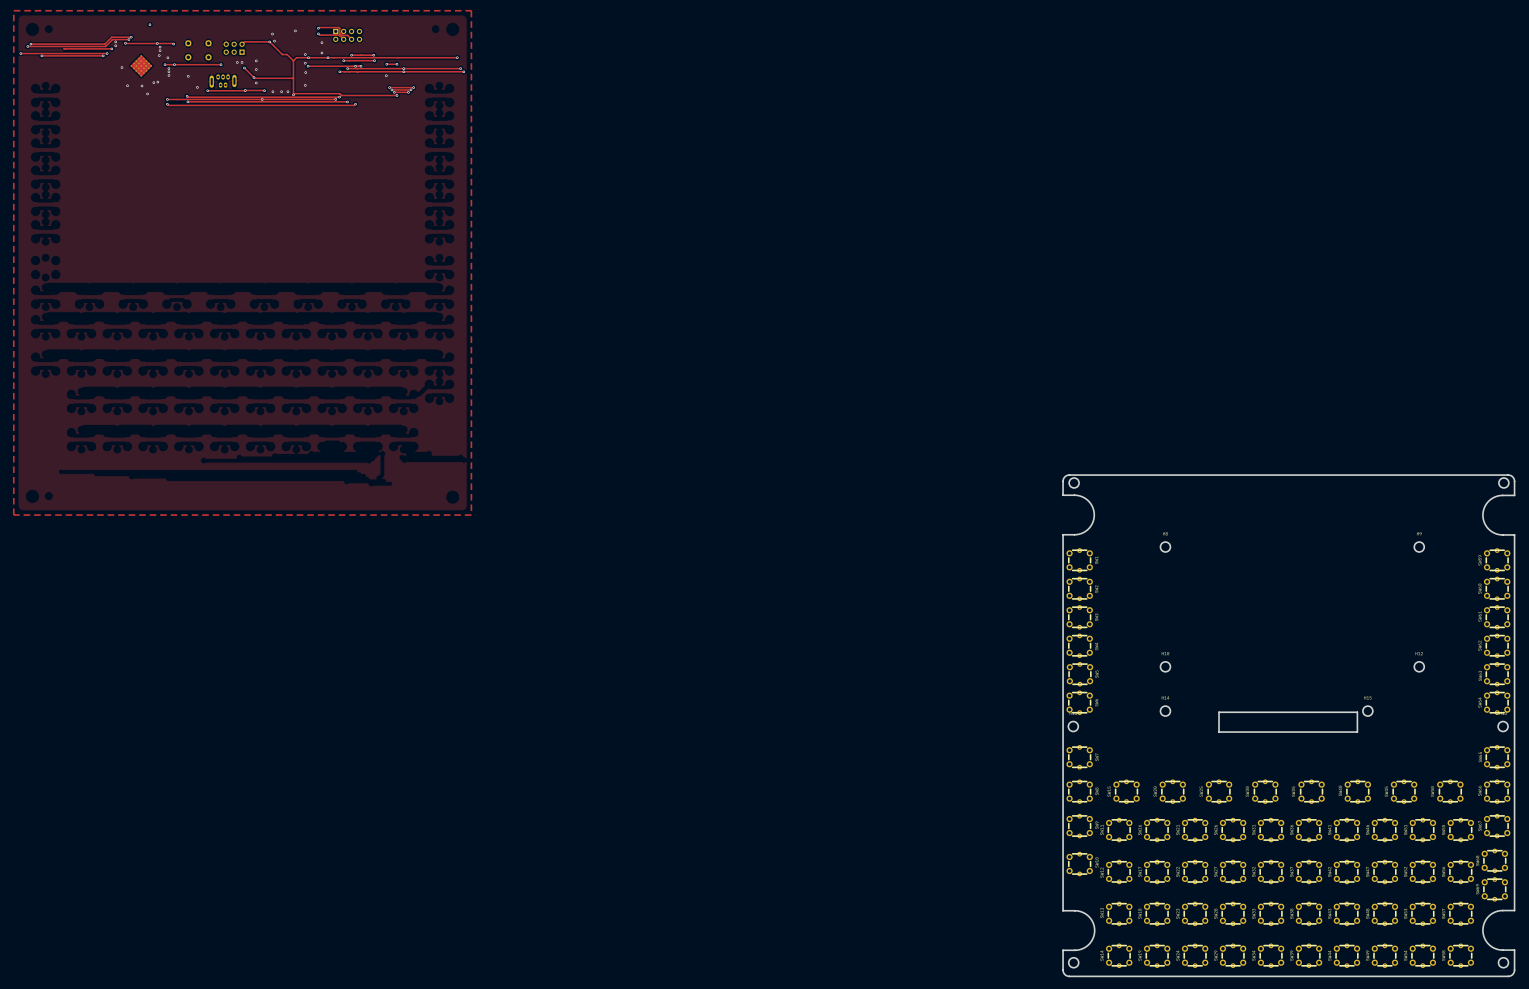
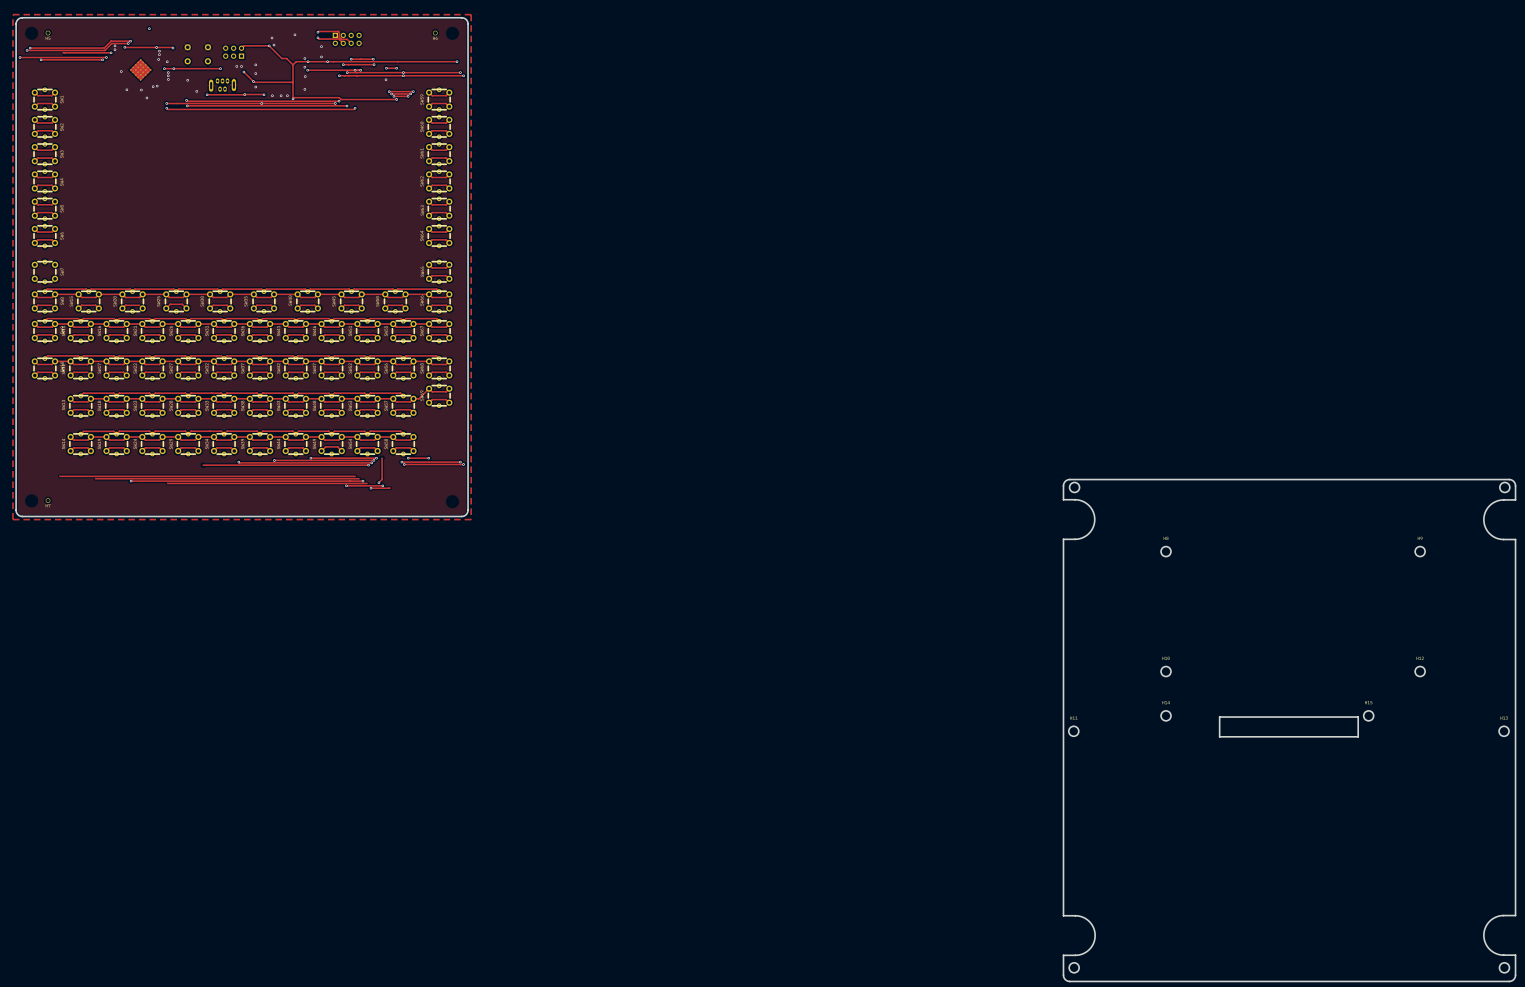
board edge: none -> (22, 17) (461, 17) (466, 19) (468, 24) (468, 510) (466, 514) (461, 516) (22, 516) (17, 514) (16, 510) (16, 24) (17, 19) (22, 17)
part: none -> (48, 33)
part: none -> (435, 33)
track: none -> (34, 92) (37, 95) (51, 95) (55, 92)
track: none -> (429, 92) (432, 95) (446, 95) (449, 92)
track: none -> (34, 106) (37, 103) (51, 103) (55, 107)
track: none -> (429, 106) (432, 103) (446, 103) (449, 106)
track: none -> (34, 119) (37, 122) (51, 122) (55, 119)
track: none -> (429, 119) (432, 122) (446, 122) (449, 119)
track: none -> (34, 133) (37, 130) (51, 130) (55, 133)
track: none -> (429, 133) (432, 130) (446, 130) (449, 133)
track: none -> (34, 147) (37, 150) (51, 150) (55, 147)
track: none -> (429, 147) (432, 150) (446, 150) (449, 147)
track: none -> (34, 161) (37, 158) (51, 158) (55, 161)
track: none -> (429, 161) (432, 158) (446, 158) (449, 161)
track: none -> (34, 174) (37, 177) (51, 177) (55, 174)
track: none -> (429, 174) (432, 177) (446, 177) (449, 174)
track: none -> (34, 188) (37, 185) (51, 185) (55, 188)
track: none -> (429, 188) (432, 185) (446, 185) (449, 188)
track: none -> (34, 201) (37, 204) (51, 204) (55, 201)
track: none -> (429, 201) (432, 204) (446, 204) (449, 201)
track: none -> (34, 215) (37, 212) (51, 212) (55, 215)
track: none -> (429, 215) (432, 212) (446, 212) (449, 215)
track: none -> (34, 228) (37, 232) (51, 232) (55, 228)
track: none -> (429, 228) (432, 232) (446, 232) (449, 228)
track: none -> (34, 242) (37, 239) (51, 239) (55, 242)
track: none -> (429, 242) (432, 239) (446, 239) (449, 242)
track: none -> (429, 264) (432, 267) (446, 267) (449, 264)
track: none -> (429, 278) (432, 275) (446, 275) (449, 278)
track: none -> (44, 291) (47, 289) (86, 289) (88, 291) (91, 289) (130, 289) (132, 291) (135, 289) (173, 289) (176, 291) (178, 289) (217, 289) (220, 291) (222, 289) (261, 289) (263, 291) (266, 289) (305, 289) (307, 291) (310, 289) (349, 289) (351, 291) (354, 289) (392, 289) (395, 291) (397, 289) (436, 289) (439, 291)
track: none -> (34, 294) (37, 297) (51, 297) (55, 294) (78, 294) (81, 297) (95, 297) (98, 294) (122, 294) (125, 297) (139, 297) (142, 294) (166, 294) (169, 297) (183, 297) (186, 294) (210, 294) (213, 297) (227, 297) (230, 294) (253, 294) (256, 297) (270, 297) (274, 294) (297, 294) (300, 297) (314, 297) (317, 294) (341, 294) (344, 297) (358, 297) (361, 294) (385, 294) (388, 297) (402, 297) (405, 294) (429, 294) (432, 297) (446, 297) (449, 294)
track: none -> (51, 305) (37, 305) (34, 308)
track: none -> (139, 305) (125, 305) (122, 308)
track: none -> (78, 308) (81, 305) (95, 305) (98, 308)
track: none -> (166, 308) (170, 304) (182, 304) (186, 308)
track: none -> (210, 308) (213, 305) (227, 305) (230, 308)
track: none -> (253, 308) (256, 305) (270, 305) (274, 308)
track: none -> (297, 308) (300, 305) (314, 305) (317, 308)
track: none -> (341, 308) (344, 305) (358, 305) (361, 308)
track: none -> (385, 308) (388, 305) (402, 305) (405, 308)
track: none -> (429, 308) (432, 305) (446, 305) (449, 308)
track: none -> (44, 321) (47, 318) (78, 318) (80, 321) (83, 318) (114, 318) (116, 321) (119, 318) (149, 318) (152, 321) (155, 318) (185, 318) (188, 321) (190, 318) (221, 318) (224, 321) (226, 318) (257, 318) (259, 321) (262, 318) (294, 318) (295, 321) (298, 318) (329, 318) (331, 321) (334, 318) (364, 318) (367, 321) (370, 318) (400, 318) (403, 321) (405, 318) (436, 318) (439, 321)
track: none -> (34, 324) (37, 327) (51, 327) (55, 324) (70, 324) (73, 327) (87, 327) (90, 324) (106, 324) (109, 327) (123, 327) (126, 324) (142, 324) (145, 327) (159, 327) (162, 324) (178, 324) (181, 327) (195, 327) (198, 324) (214, 324) (217, 327) (231, 327) (234, 324) (249, 324) (252, 327) (267, 327) (270, 324) (285, 324) (288, 327) (302, 327) (305, 324) (321, 324) (324, 327) (338, 327) (341, 324) (357, 324) (360, 327) (374, 327) (377, 324) (393, 324) (396, 327) (429, 324) (432, 327) (446, 327) (449, 324)
track: none -> (34, 338) (37, 334) (51, 334) (55, 338)
track: none -> (70, 338) (73, 334) (87, 334) (90, 338)
track: none -> (106, 338) (109, 334) (123, 334) (126, 338)
track: none -> (142, 338) (145, 334) (159, 334) (162, 338)
track: none -> (178, 338) (181, 334) (195, 334) (198, 338)
track: none -> (214, 338) (217, 334) (231, 334) (234, 338)
track: none -> (249, 338) (252, 334) (267, 334) (270, 338)
track: none -> (285, 338) (288, 334) (302, 334) (305, 338)
track: none -> (321, 338) (324, 334) (338, 334) (341, 338)
track: none -> (357, 338) (360, 334) (374, 334) (377, 338)
track: none -> (393, 338) (396, 334) (410, 334) (413, 338)
track: none -> (429, 338) (432, 334) (446, 334) (449, 338)
track: none -> (44, 358) (47, 355) (78, 355) (80, 358) (83, 355) (113, 355) (116, 358) (119, 356) (149, 356) (152, 358) (155, 355) (185, 355) (188, 358) (191, 355) (221, 355) (224, 358) (226, 355) (257, 355) (259, 358) (262, 355) (293, 355) (295, 358) (298, 355) (328, 355) (331, 358) (334, 355) (364, 355) (367, 358) (370, 355) (400, 355) (403, 358) (406, 355) (436, 355) (439, 358)
track: none -> (34, 361) (37, 364) (51, 364) (55, 361) (70, 361) (73, 364) (87, 364) (90, 361) (106, 361) (109, 364) (123, 364) (126, 361) (142, 361) (145, 364) (159, 364) (162, 361) (178, 361) (181, 364) (195, 364) (198, 361) (214, 361) (217, 364) (231, 364) (234, 361) (249, 361) (252, 364) (267, 364) (270, 361) (285, 361) (288, 364) (302, 364) (305, 361) (321, 361) (324, 364) (338, 364) (341, 361) (357, 361) (360, 364) (374, 364) (377, 361) (393, 361) (396, 364) (429, 361) (432, 364) (446, 364) (449, 361)
track: none -> (87, 372) (73, 372) (70, 375)
track: none -> (159, 372) (145, 372) (142, 375)
track: none -> (34, 375) (37, 372) (51, 372) (55, 375)
track: none -> (106, 375) (109, 372) (123, 372) (126, 375)
track: none -> (178, 375) (181, 372) (195, 372) (198, 375)
track: none -> (214, 375) (217, 372) (231, 372) (234, 375)
track: none -> (249, 375) (252, 372) (267, 372) (270, 375)
track: none -> (285, 375) (288, 372) (302, 372) (305, 375)
track: none -> (321, 375) (324, 372) (338, 372) (341, 375)
track: none -> (357, 375) (360, 372) (374, 372) (377, 375)
track: none -> (393, 375) (396, 372) (410, 372) (413, 375)
track: none -> (429, 375) (432, 372) (446, 372) (449, 375)
track: none -> (449, 388) (446, 391) (432, 391) (429, 388) (418, 398) (413, 398) (410, 401) (396, 401) (393, 398) (377, 398) (374, 401) (360, 401) (357, 398) (341, 398) (338, 401) (324, 401) (321, 398) (305, 398) (302, 401) (288, 401) (285, 398) (270, 398) (267, 401) (252, 401) (249, 398) (234, 398) (231, 401) (217, 401) (214, 398) (198, 398) (195, 401) (181, 401) (178, 398) (162, 398) (159, 401) (145, 401) (142, 398) (126, 398) (123, 401) (90, 398) (87, 401) (73, 401) (70, 398)
track: none -> (80, 396) (83, 393) (113, 393) (116, 396) (119, 393) (149, 393) (152, 396) (155, 393) (185, 393) (188, 396) (191, 393) (221, 393) (224, 396) (226, 393) (257, 393) (259, 396) (262, 393) (293, 393) (295, 396)
track: none -> (295, 396) (298, 393) (329, 393) (331, 396) (334, 393) (364, 393) (367, 396) (370, 393) (400, 393) (403, 396)
track: none -> (429, 402) (432, 399) (446, 399) (449, 402)
track: none -> (70, 412) (73, 409) (87, 409) (90, 412)
track: none -> (106, 412) (109, 409) (123, 409) (126, 412)
track: none -> (142, 412) (145, 409) (159, 409) (162, 412)
track: none -> (178, 412) (181, 409) (195, 409) (198, 412)
track: none -> (214, 412) (217, 409) (231, 409) (234, 412)
track: none -> (249, 412) (252, 409) (267, 409) (270, 412)
track: none -> (285, 412) (288, 409) (302, 409) (305, 412)
track: none -> (321, 412) (324, 409) (338, 409) (341, 412)
track: none -> (357, 412) (360, 409) (374, 409) (377, 412)
track: none -> (393, 412) (396, 409) (410, 409) (413, 412)
track: none -> (80, 434) (83, 431) (113, 431) (116, 434) (119, 431) (149, 431) (152, 434) (155, 431) (185, 431) (188, 434) (191, 431) (221, 431) (224, 434) (227, 431) (257, 431) (259, 434) (262, 431) (292, 431) (295, 434)
track: none -> (295, 434) (298, 431) (328, 431) (331, 434) (334, 431) (364, 431) (367, 434) (370, 431) (400, 431) (403, 434)
track: none -> (70, 436) (73, 440) (87, 440) (90, 436) (106, 436) (109, 440) (123, 440) (126, 436) (142, 436) (145, 440) (159, 440) (162, 436) (178, 436) (181, 440) (195, 440) (198, 436) (214, 436) (217, 440) (231, 440) (234, 436) (249, 436) (252, 440) (267, 440) (270, 436) (285, 436) (288, 440) (302, 440) (305, 436) (321, 436) (324, 440) (338, 440) (341, 436) (357, 436) (360, 440) (393, 436) (396, 440) (410, 440) (413, 436)
track: none -> (70, 451) (73, 447) (87, 447) (90, 451)
track: none -> (106, 451) (109, 447) (123, 447) (126, 451)
track: none -> (142, 451) (145, 447) (159, 447) (162, 451)
track: none -> (178, 451) (181, 447) (195, 447) (198, 451)
track: none -> (214, 451) (217, 447) (231, 447) (234, 451)
track: none -> (249, 451) (252, 447) (267, 447) (270, 451)
track: none -> (285, 451) (288, 447) (302, 447) (305, 451)
track: none -> (321, 451) (325, 446) (337, 446) (341, 451)
track: none -> (357, 451) (360, 447) (374, 447) (377, 451)
track: none -> (393, 451) (396, 447) (410, 447) (413, 451)
track: none -> (310, 458) (376, 458)
via: none -> (310, 458)
via: none -> (376, 458)
track: none -> (382, 458) (382, 479) (378, 482)
track: none -> (408, 458) (428, 458)
via: none -> (408, 458)
via: none -> (428, 458)
track: none -> (373, 460) (274, 460)
via: none -> (373, 460)
via: none -> (274, 460)
track: none -> (238, 462) (371, 462)
via: none -> (238, 462)
track: none -> (401, 462) (460, 462)
via: none -> (401, 462)
via: none -> (460, 462)
via: none -> (371, 462)
track: none -> (203, 465) (368, 465)
via: none -> (368, 465)
track: none -> (404, 464) (463, 464)
via: none -> (404, 464)
via: none -> (463, 464)
track: none -> (59, 476) (355, 476)
track: none -> (95, 478) (359, 478)
track: none -> (131, 481) (363, 481)
via: none -> (131, 481)
via: none -> (363, 481)
via: none -> (378, 482)
track: none -> (167, 483) (367, 483)
track: none -> (346, 485) (382, 485)
via: none -> (346, 485)
via: none -> (382, 485)
track: none -> (370, 488) (389, 488)
via: none -> (370, 488)
part: none -> (48, 500)
part position: (1079, 560) -> (44, 99)
part position: (1497, 560) -> (439, 99)
part position: (1079, 588) -> (44, 126)
part position: (1497, 588) -> (439, 126)
part position: (1079, 617) -> (44, 154)
part position: (1497, 617) -> (439, 154)
part position: (1079, 645) -> (44, 181)
part position: (1497, 645) -> (439, 181)
part position: (1079, 674) -> (44, 208)
part position: (1497, 674) -> (439, 208)
part position: (1079, 702) -> (44, 236)
part position: (1497, 702) -> (439, 236)
part position: (1079, 757) -> (44, 271)
part position: (1497, 757) -> (439, 271)
part position: (1079, 791) -> (44, 301)
part position: (1126, 791) -> (88, 301)
part position: (1172, 791) -> (132, 301)
part position: (1219, 791) -> (176, 301)
part position: (1265, 791) -> (220, 301)
part position: (1311, 791) -> (263, 301)
part position: (1357, 791) -> (307, 301)
part position: (1404, 791) -> (351, 301)
part position: (1450, 791) -> (395, 301)
part position: (1497, 791) -> (439, 301)
part position: (1079, 826) -> (44, 331)
part position: (1497, 826) -> (439, 331)
part position: (1119, 830) -> (80, 331)
part position: (1157, 830) -> (116, 331)
part position: (1195, 830) -> (152, 331)
part position: (1233, 830) -> (188, 331)
part position: (1271, 830) -> (224, 331)
part position: (1308, 830) -> (259, 331)
part position: (1346, 830) -> (295, 331)
part position: (1384, 830) -> (331, 331)
part position: (1422, 830) -> (367, 331)
part position: (1460, 830) -> (403, 331)
part position: (1494, 860) -> (439, 368)
part position: (1079, 864) -> (44, 368)
part position: (1119, 871) -> (80, 368)
part position: (1157, 871) -> (116, 368)
part position: (1195, 871) -> (152, 368)
part position: (1233, 871) -> (188, 368)
part position: (1271, 871) -> (224, 368)
part position: (1308, 871) -> (259, 368)
part position: (1346, 871) -> (295, 368)
part position: (1384, 871) -> (331, 368)
part position: (1422, 871) -> (367, 368)
part position: (1460, 871) -> (403, 368)
part position: (1494, 889) -> (439, 395)
part position: (1119, 913) -> (80, 405)
part position: (1157, 913) -> (116, 405)
part position: (1195, 913) -> (152, 405)
part position: (1233, 913) -> (188, 405)
part position: (1271, 913) -> (224, 405)
part position: (1308, 913) -> (259, 405)
part position: (1346, 913) -> (295, 405)
part position: (1384, 913) -> (331, 405)
part position: (1422, 913) -> (367, 405)
part position: (1460, 913) -> (403, 405)
part position: (1119, 955) -> (80, 444)
part position: (1157, 955) -> (116, 444)
part position: (1195, 955) -> (152, 444)
part position: (1233, 955) -> (188, 444)
part position: (1271, 955) -> (224, 444)
part position: (1308, 955) -> (259, 444)
part position: (1346, 955) -> (295, 444)
part position: (1384, 955) -> (331, 444)
part position: (1422, 955) -> (367, 444)
part position: (1460, 955) -> (403, 444)

